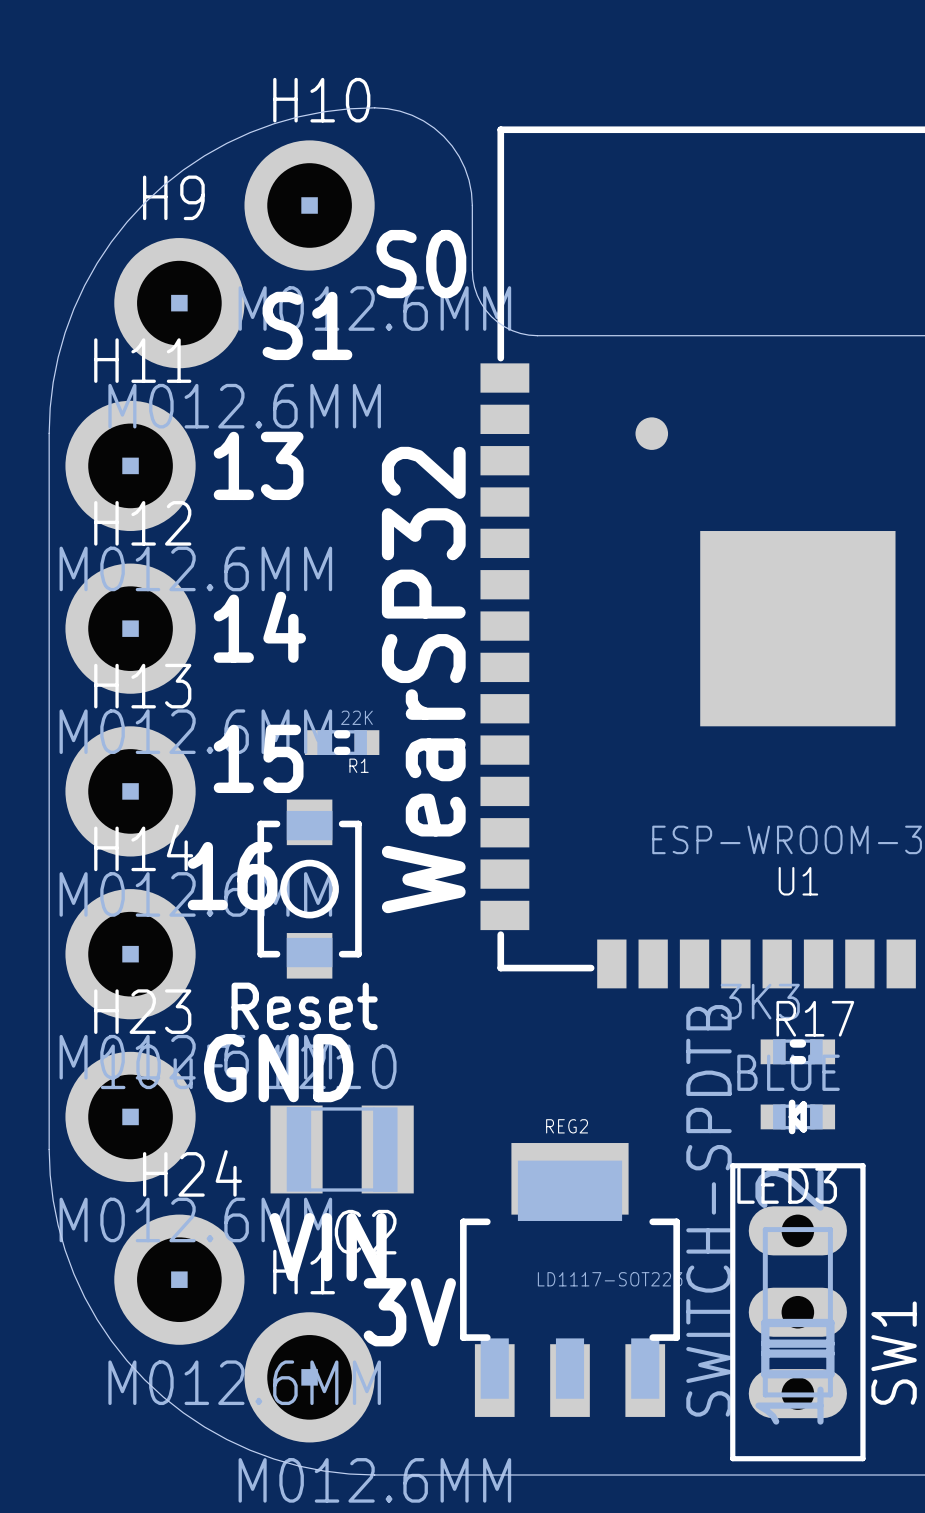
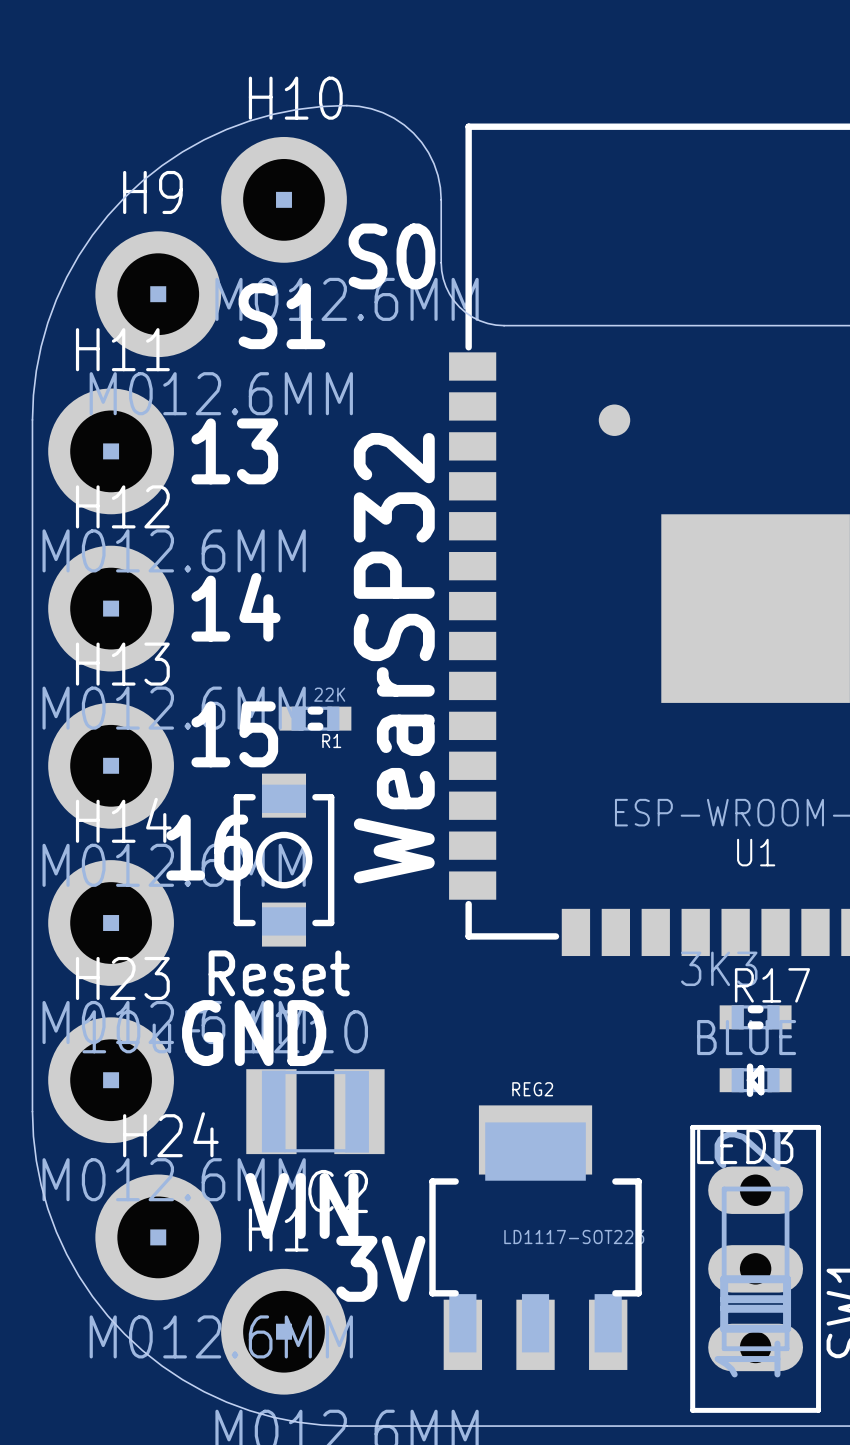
SW1 value: SWITCH-SPDTB (708, 1210) -> none

